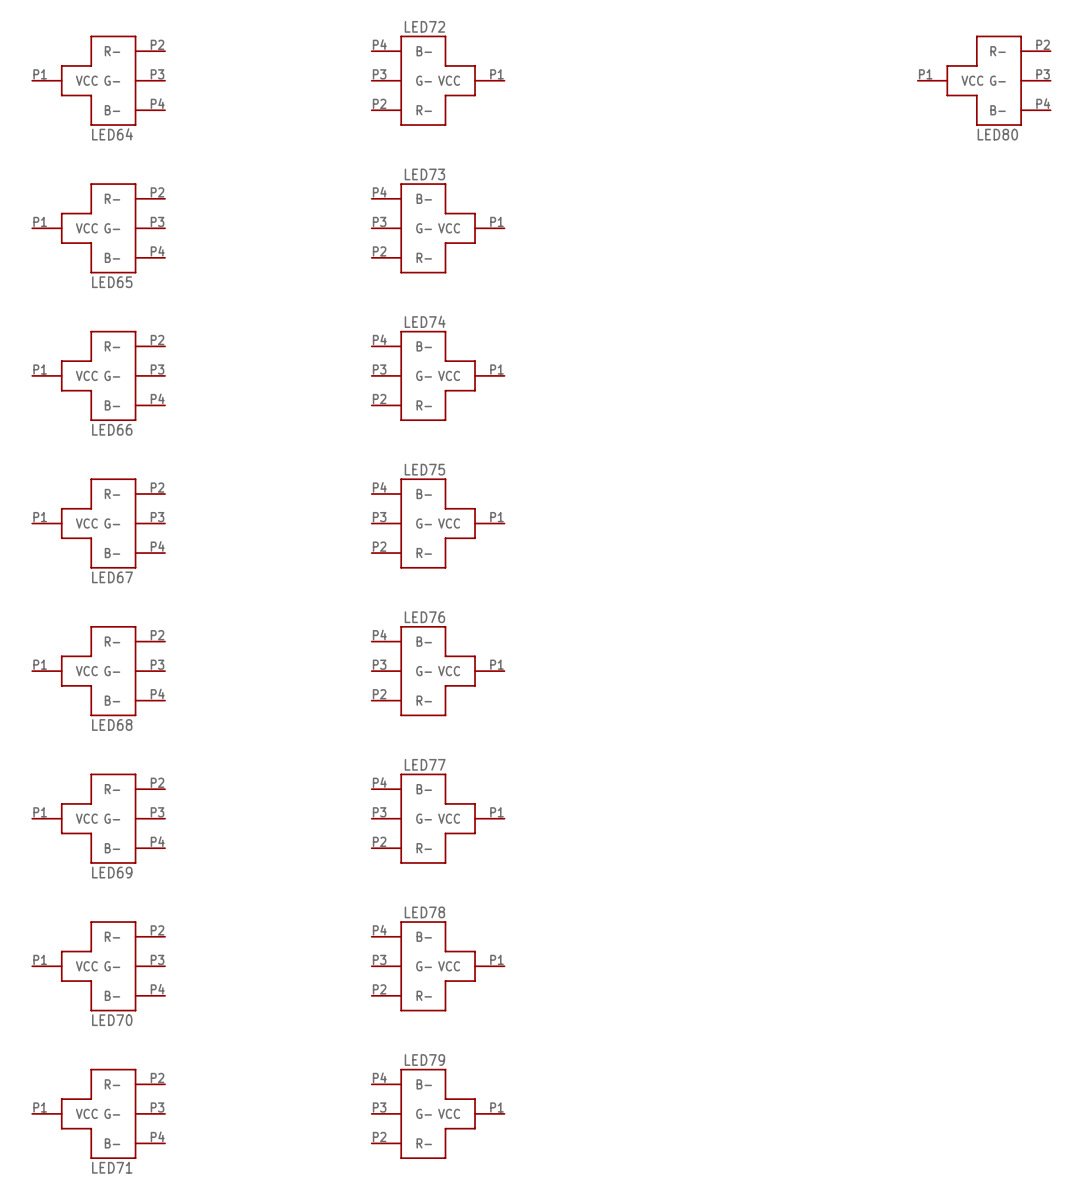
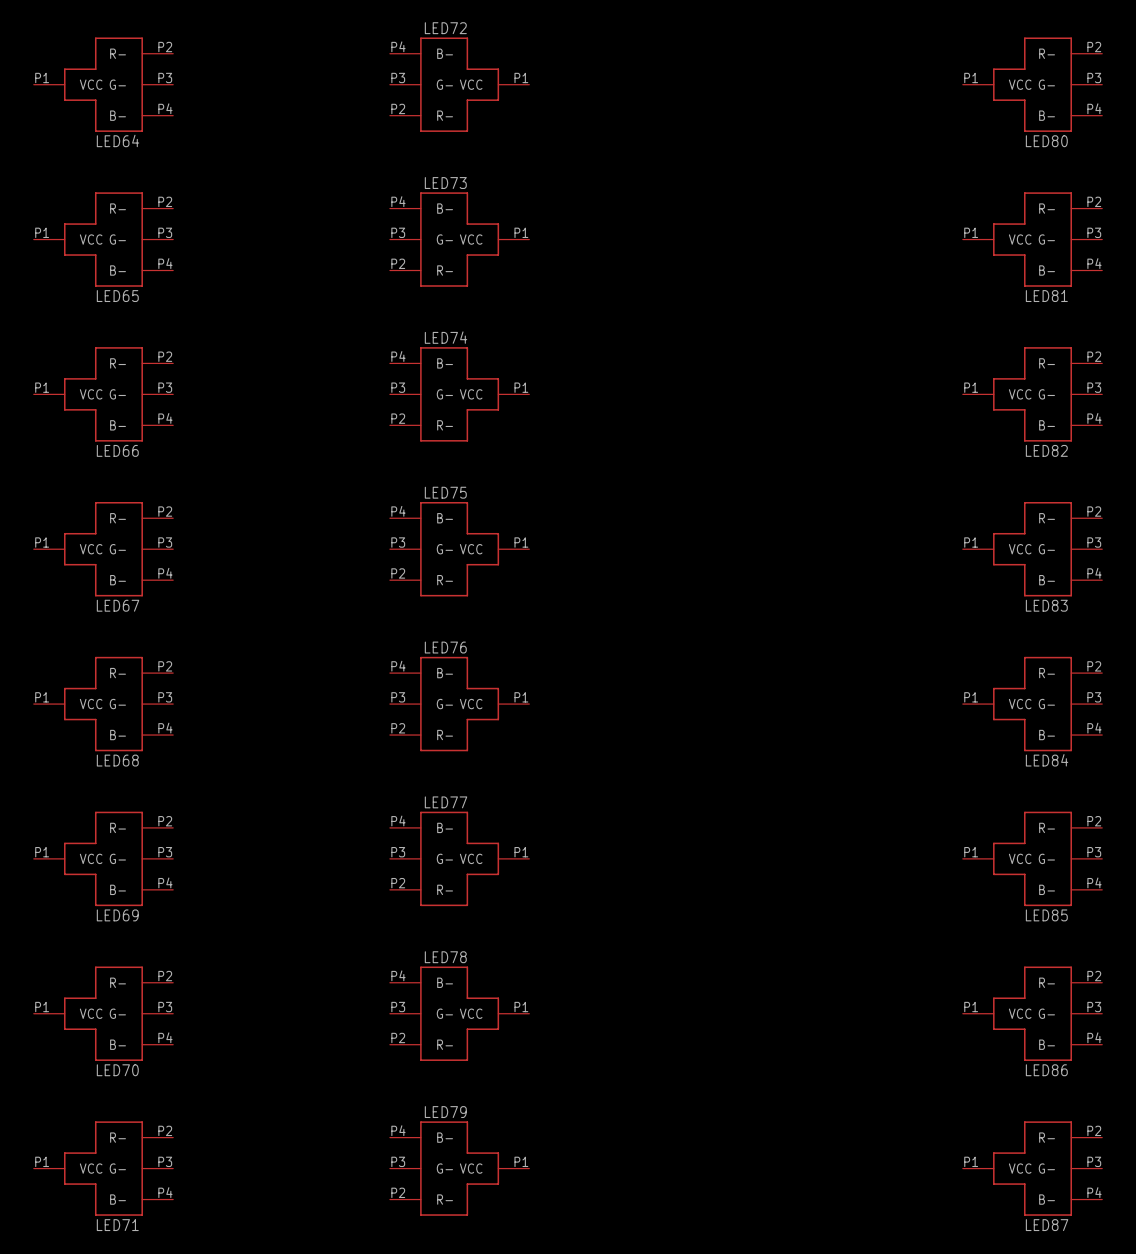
LED81: none -> (1032, 239)
LED82: none -> (1032, 394)
LED83: none -> (1032, 549)
LED84: none -> (1032, 704)
LED85: none -> (1032, 858)
LED86: none -> (1032, 1013)
LED87: none -> (1032, 1168)

